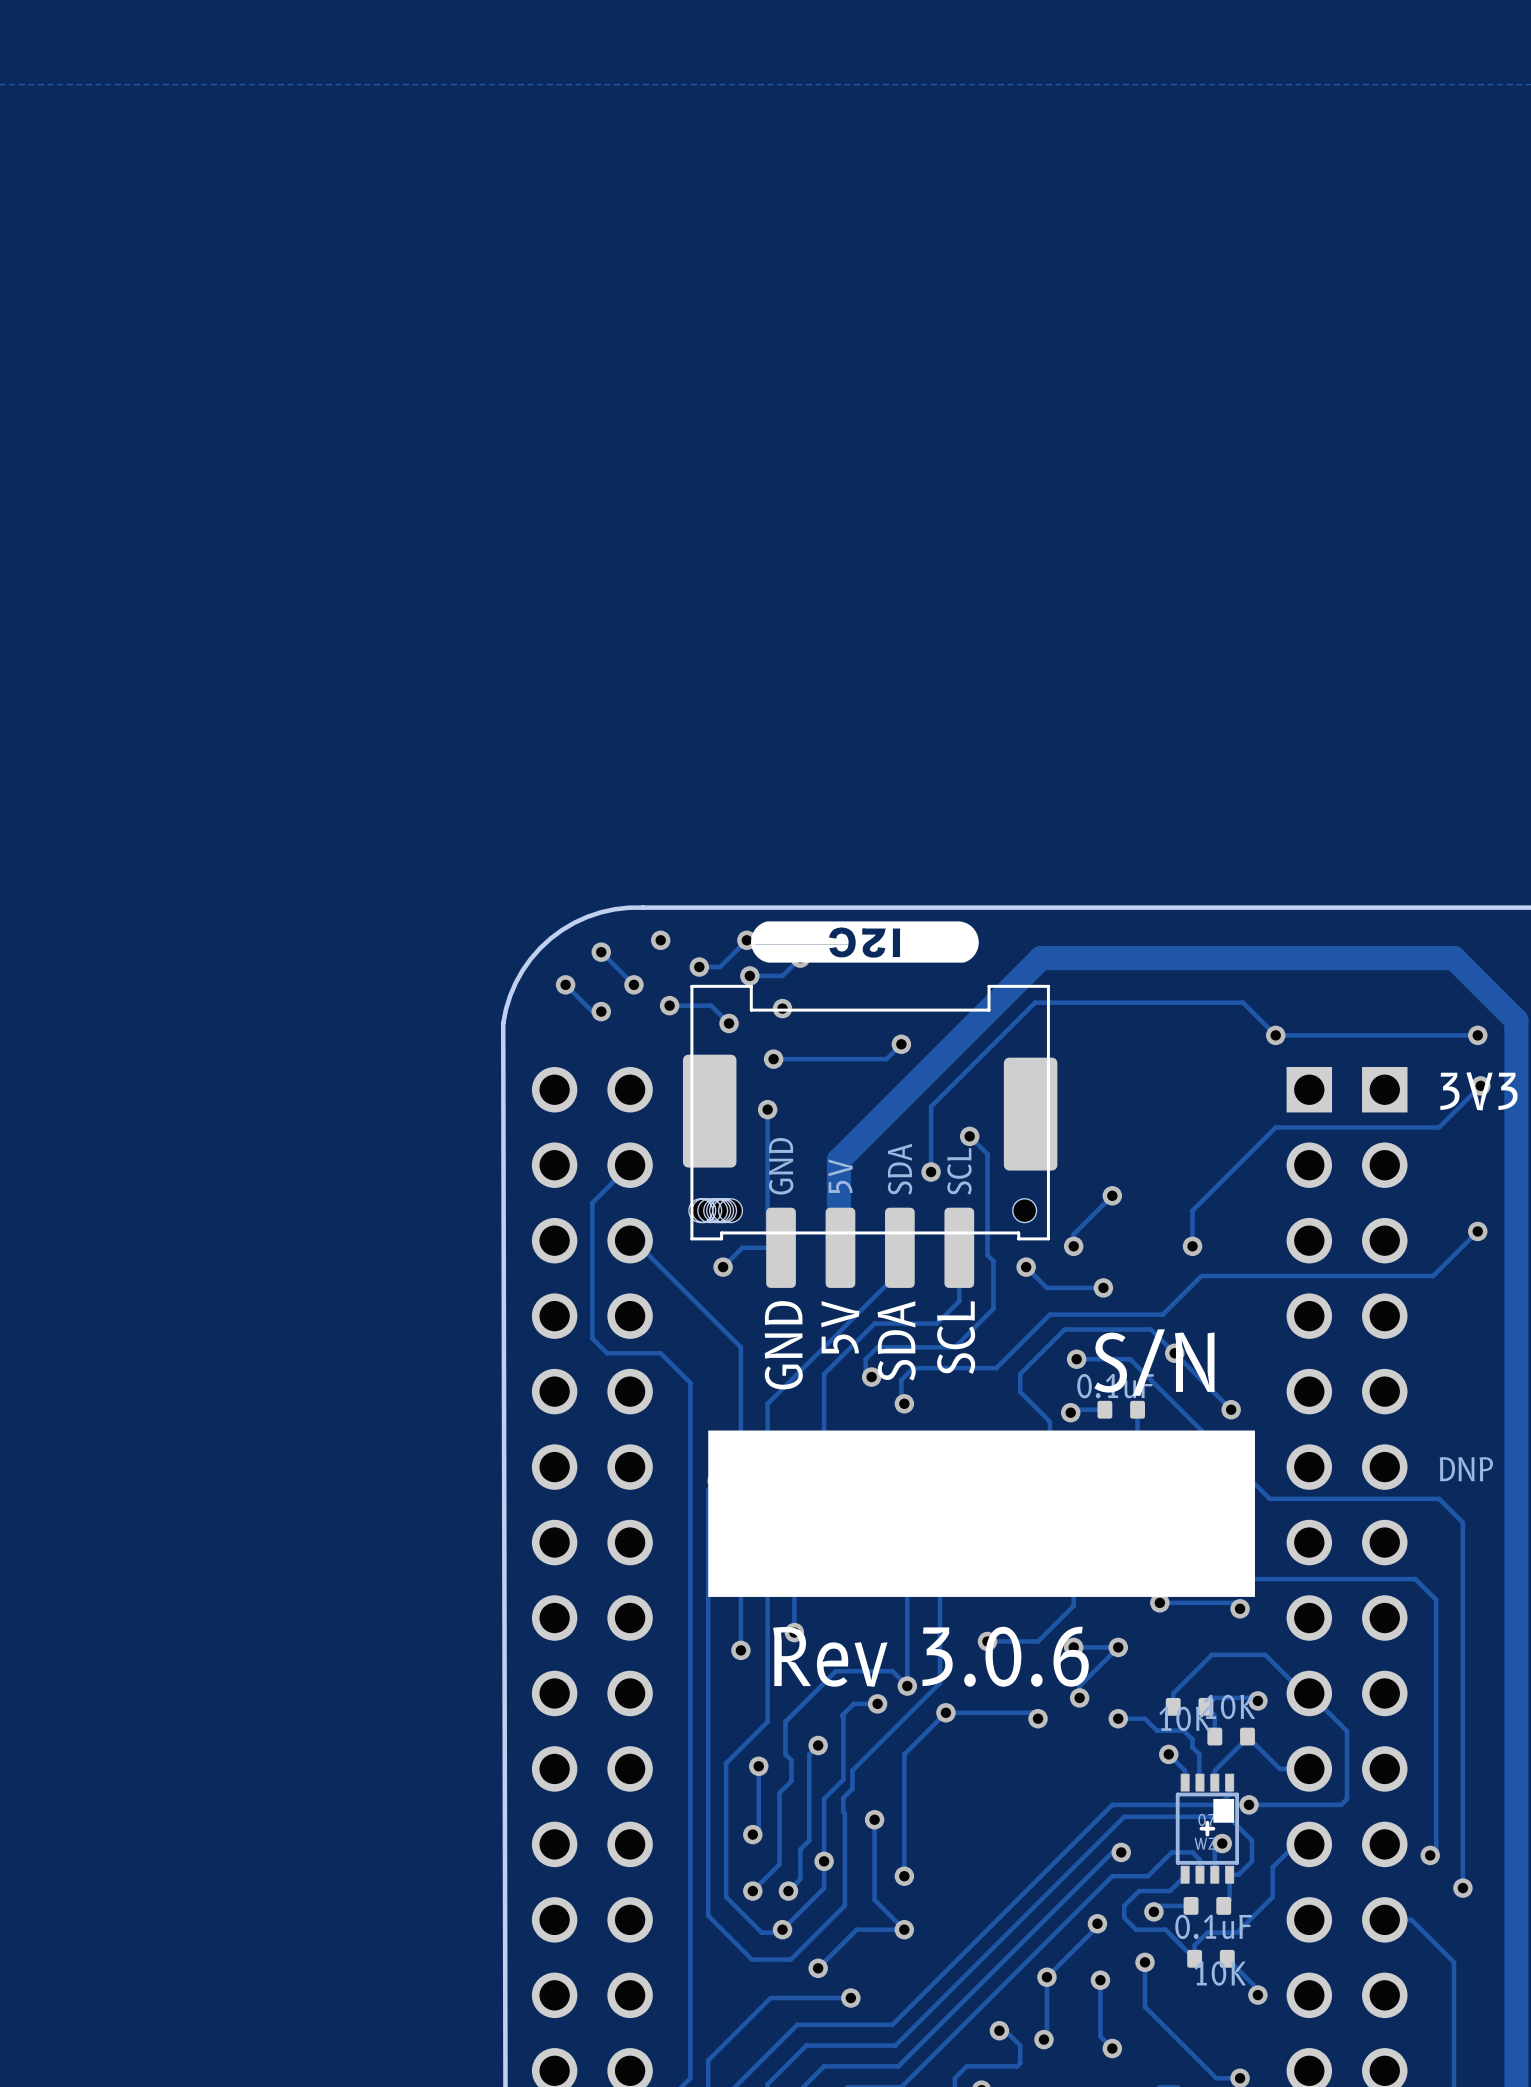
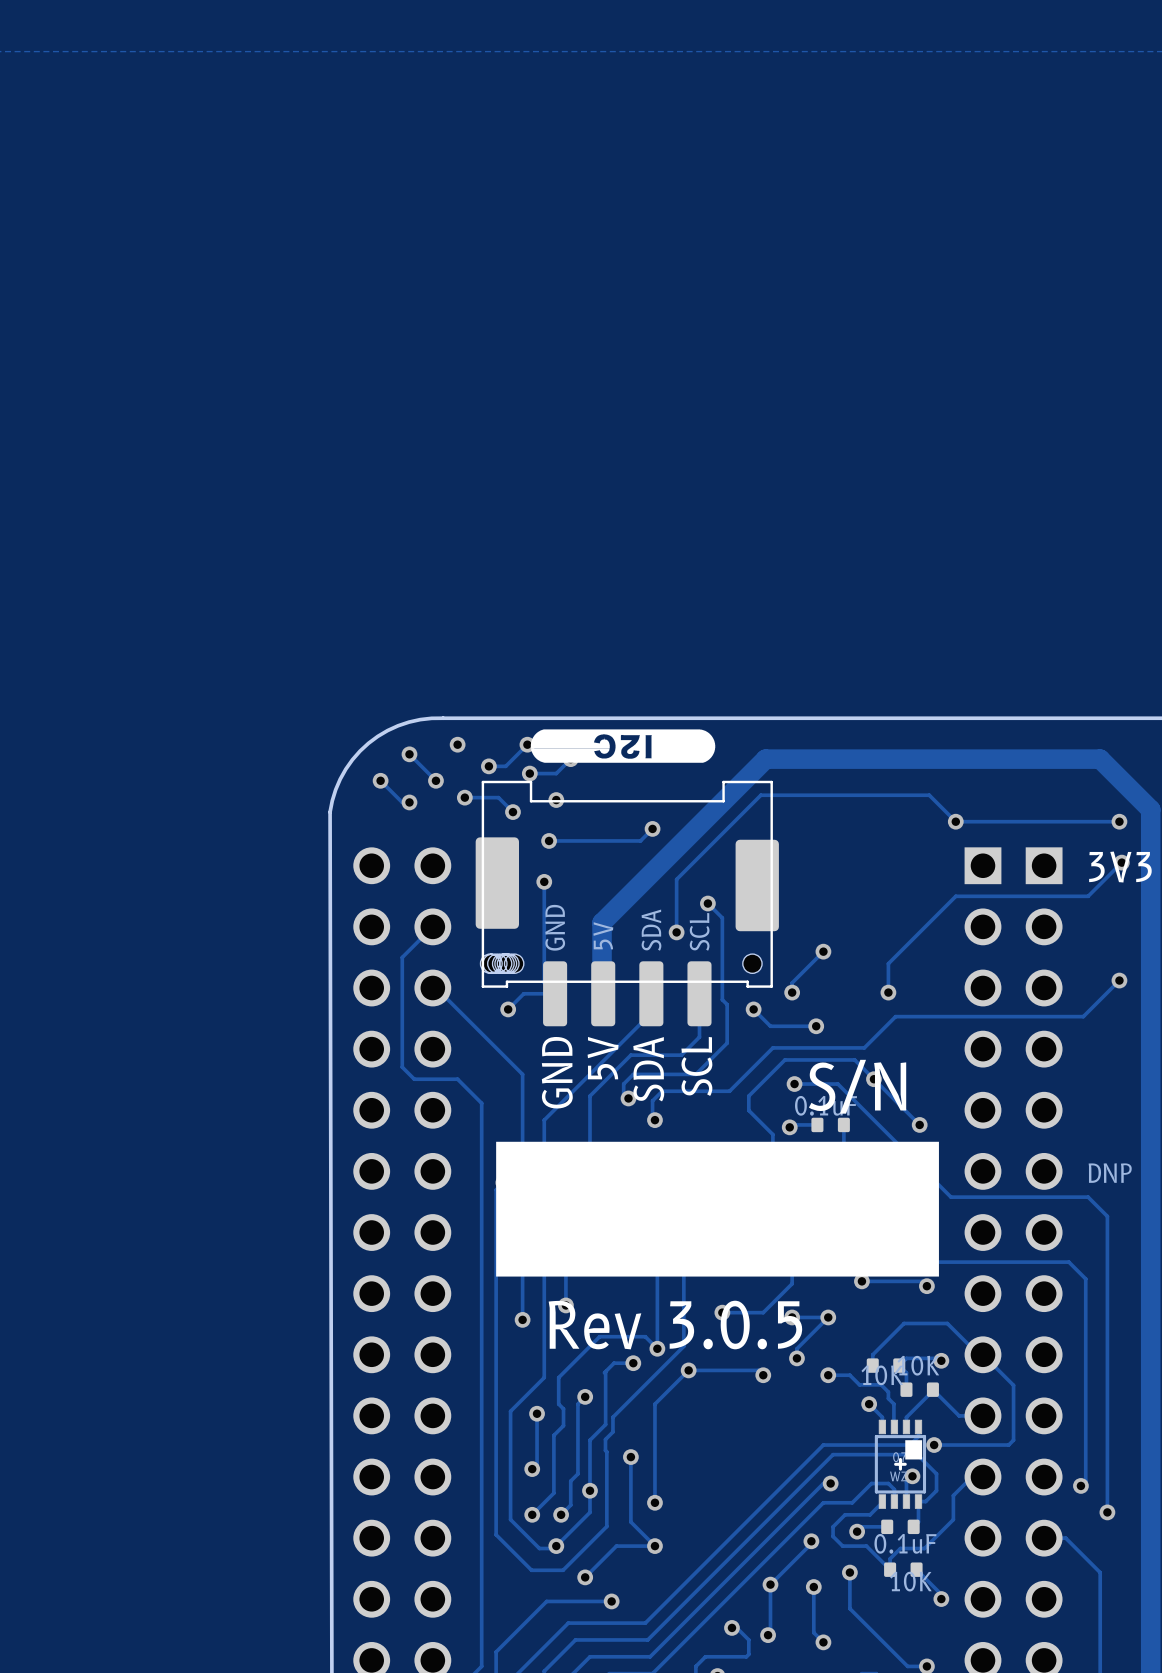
text: Rev 3.0.6 (930, 1656) -> Rev 3.0.5 (675, 1325)

